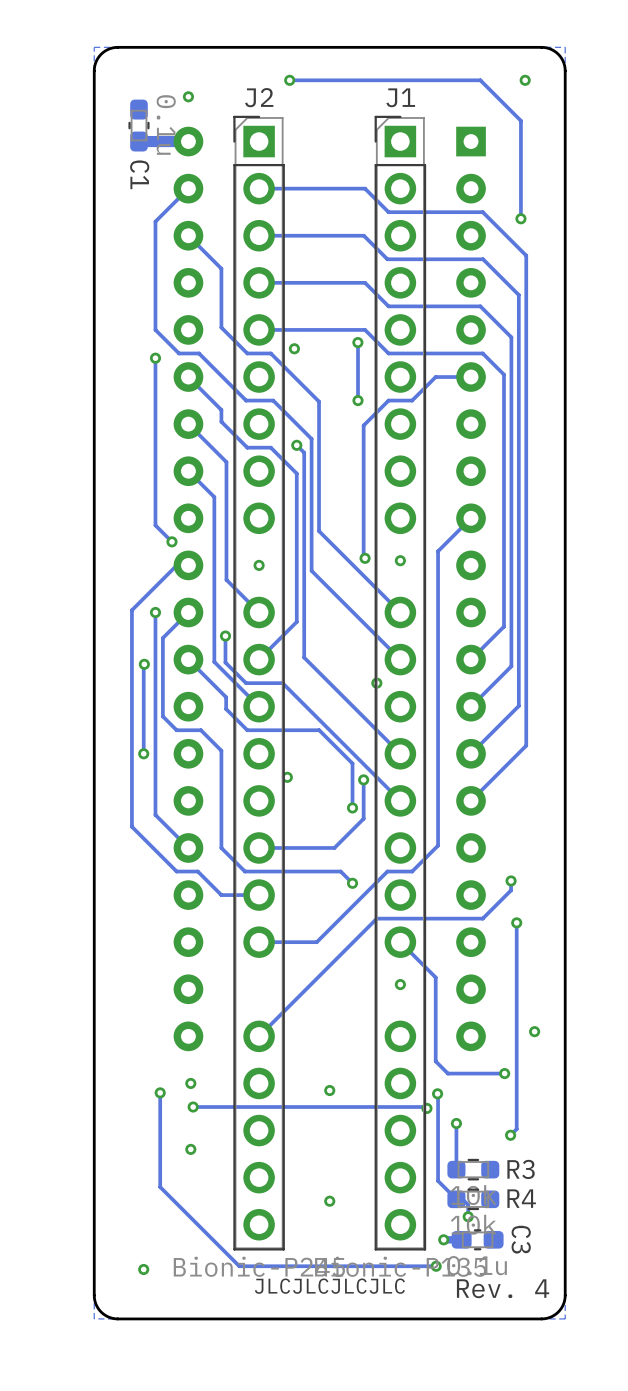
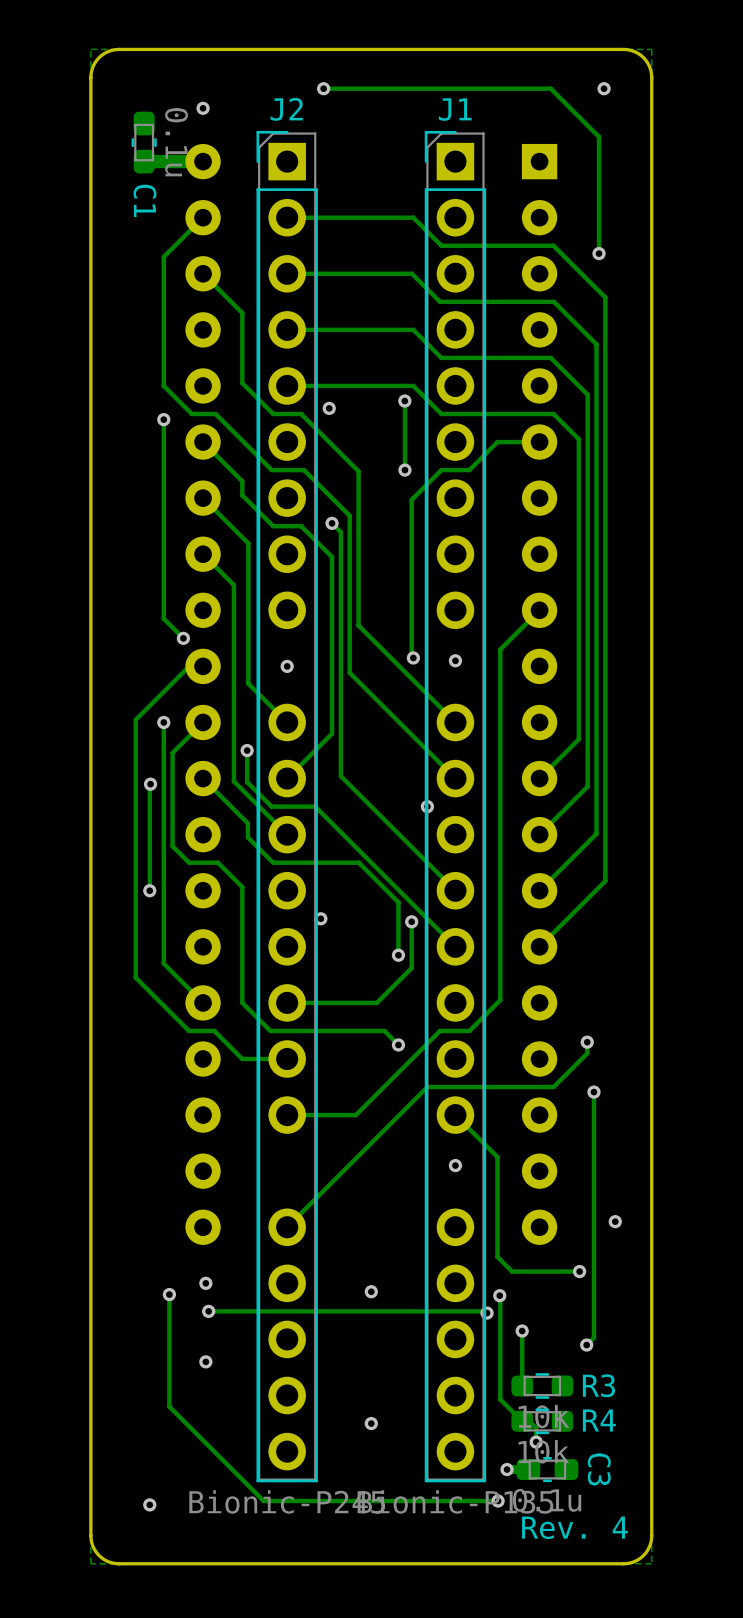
text: JLCJLCJLCJLC (329, 1286) -> none

